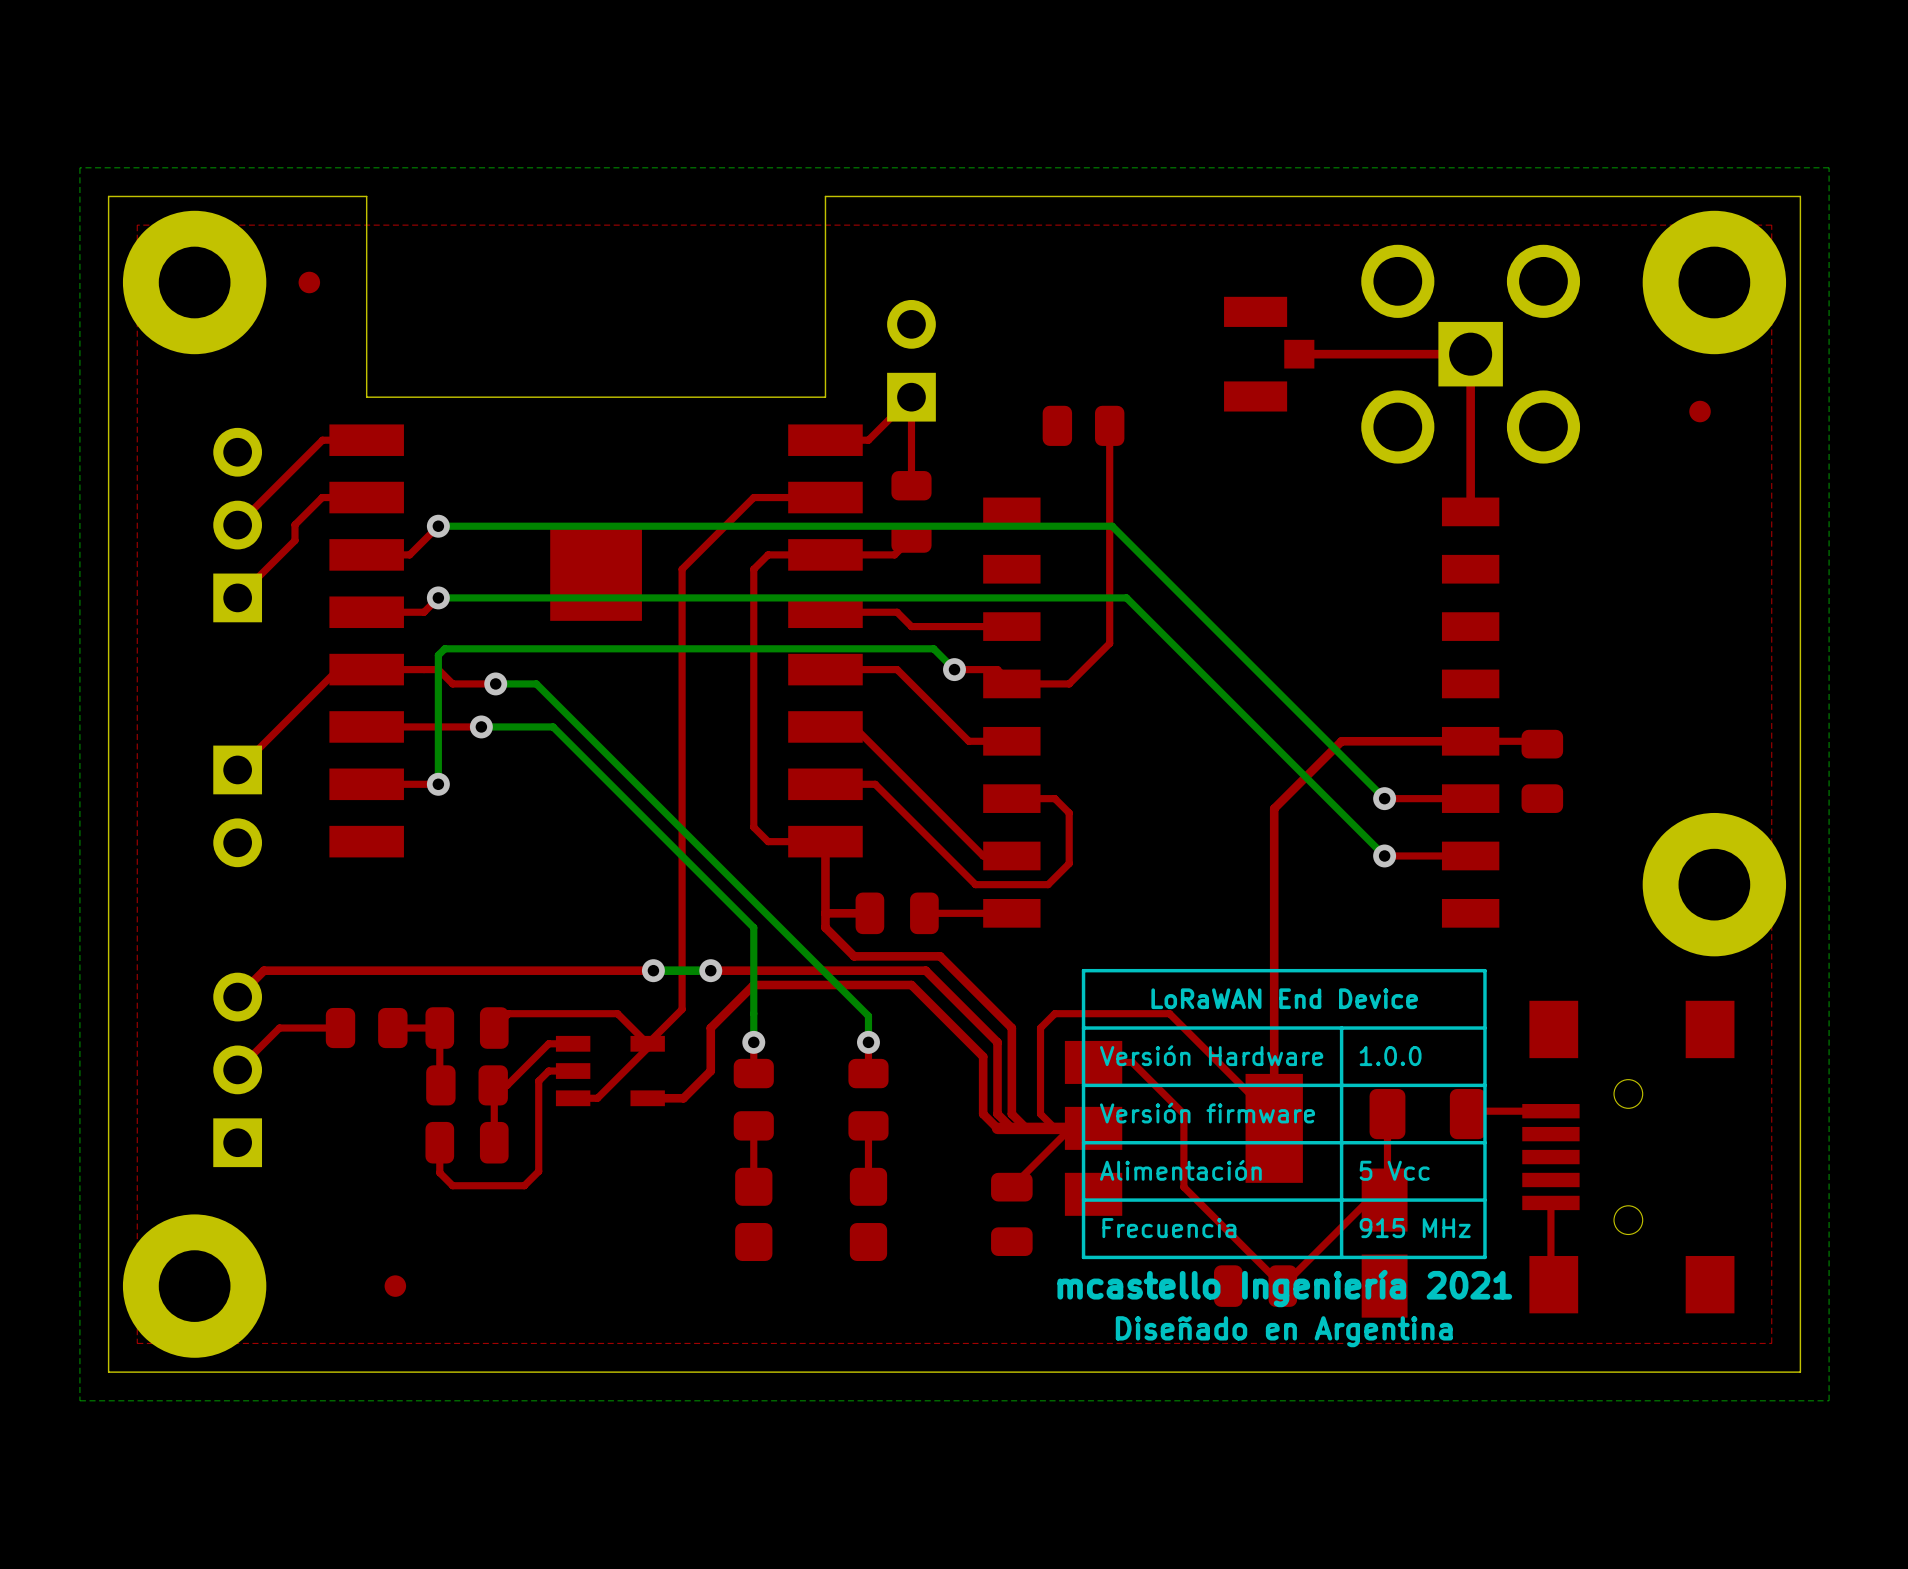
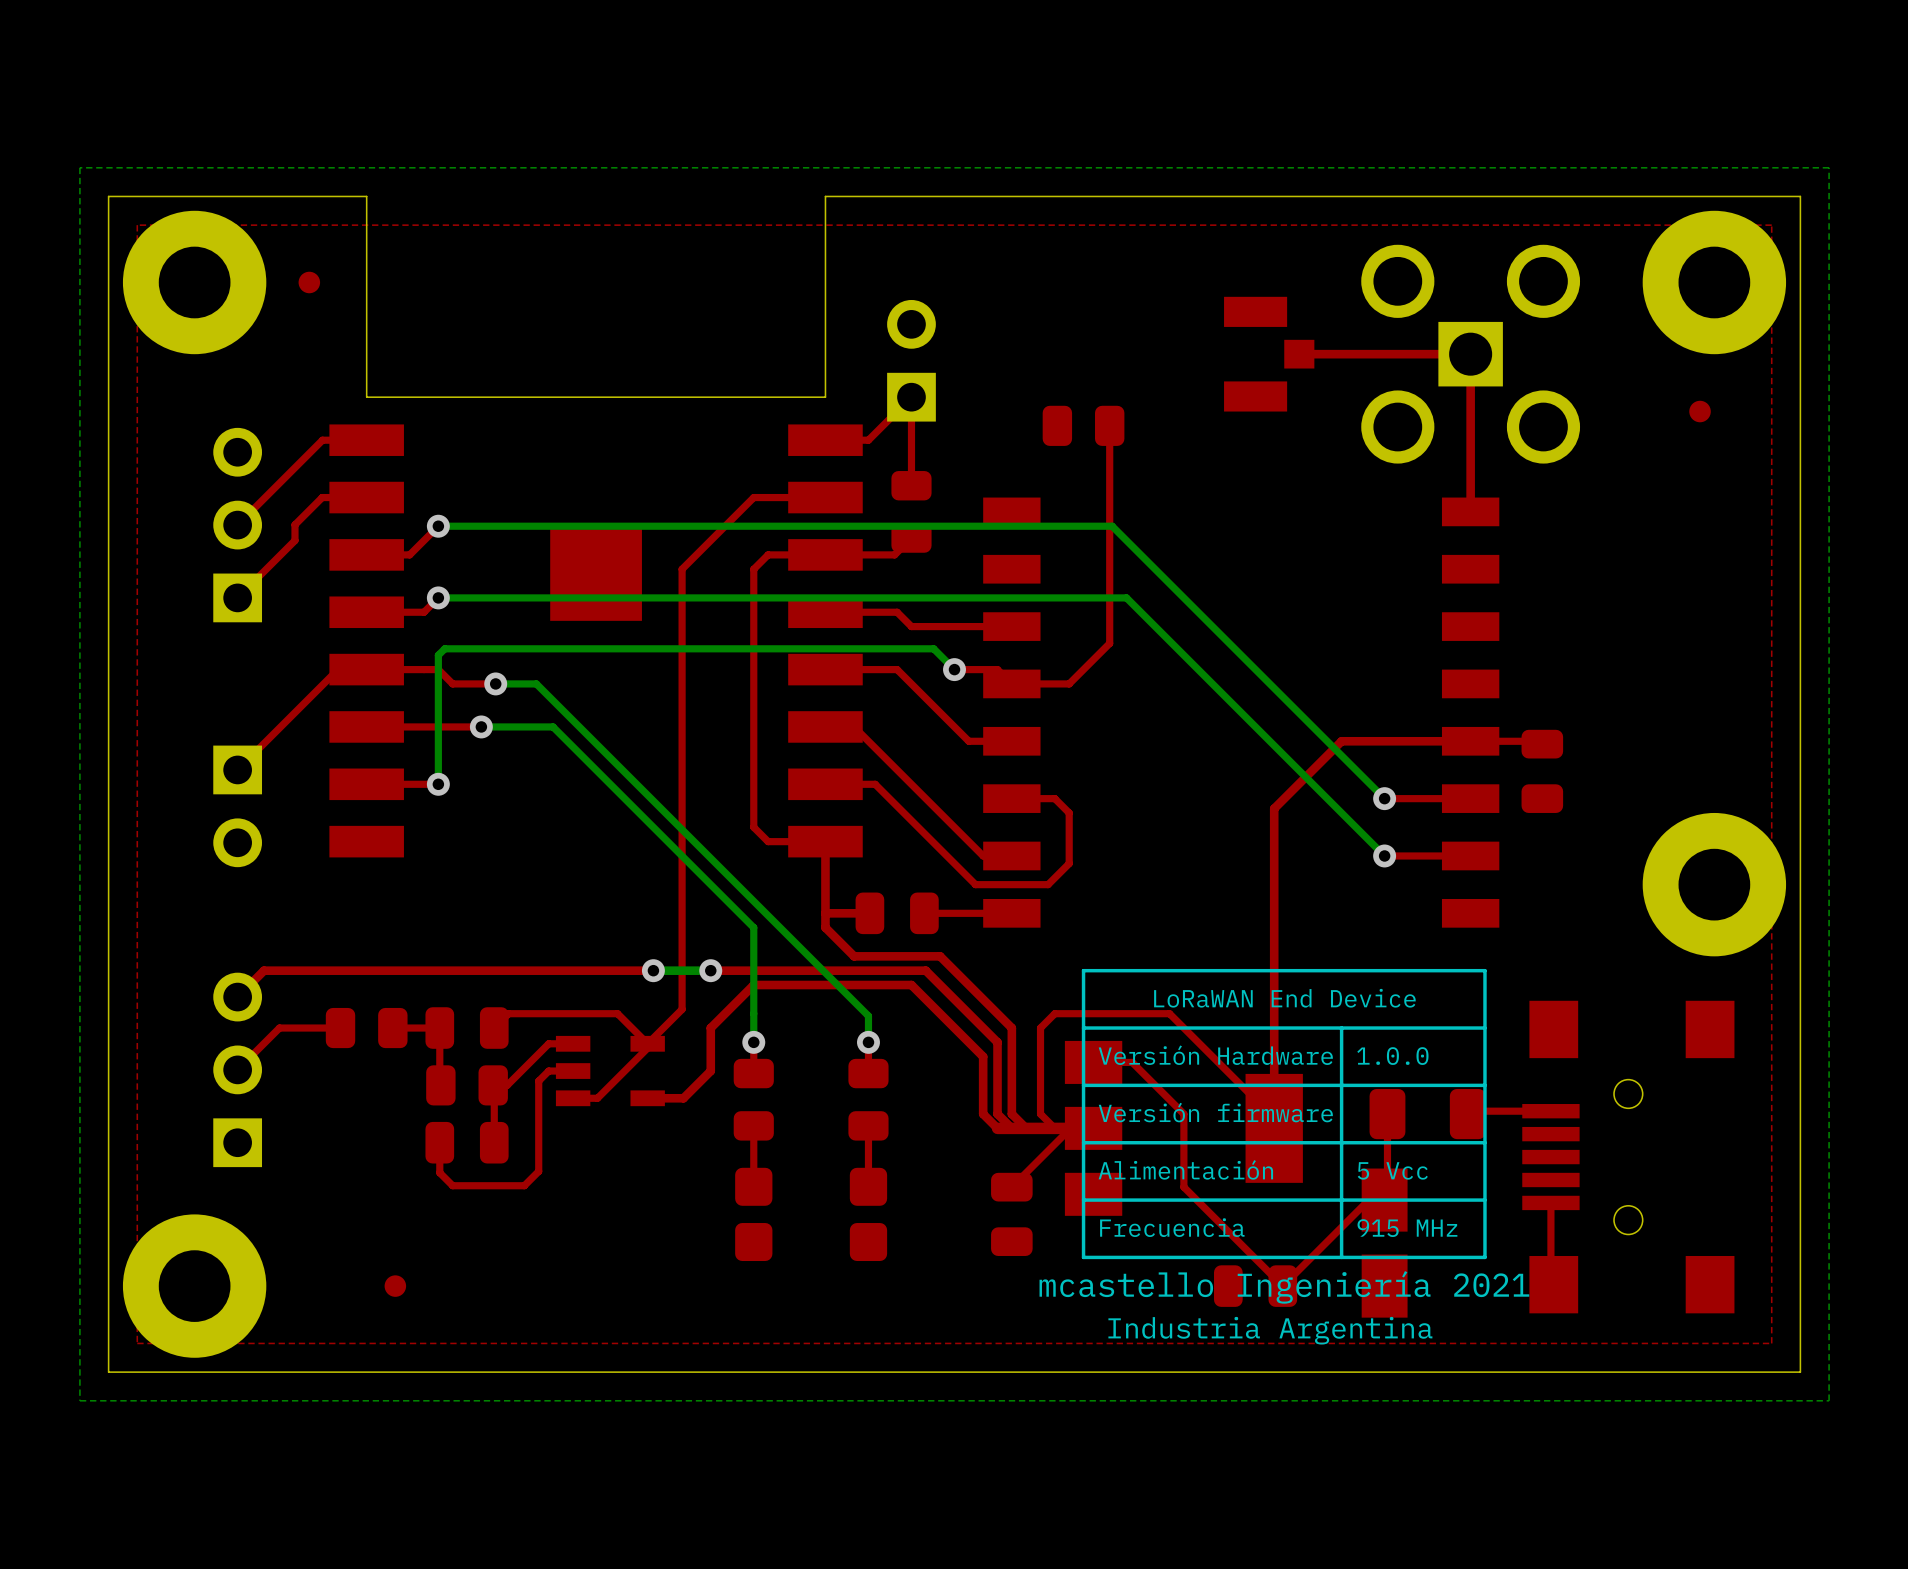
text: Diseñado en Argentina (1284, 1331) -> Industria Argentina (1270, 1330)

